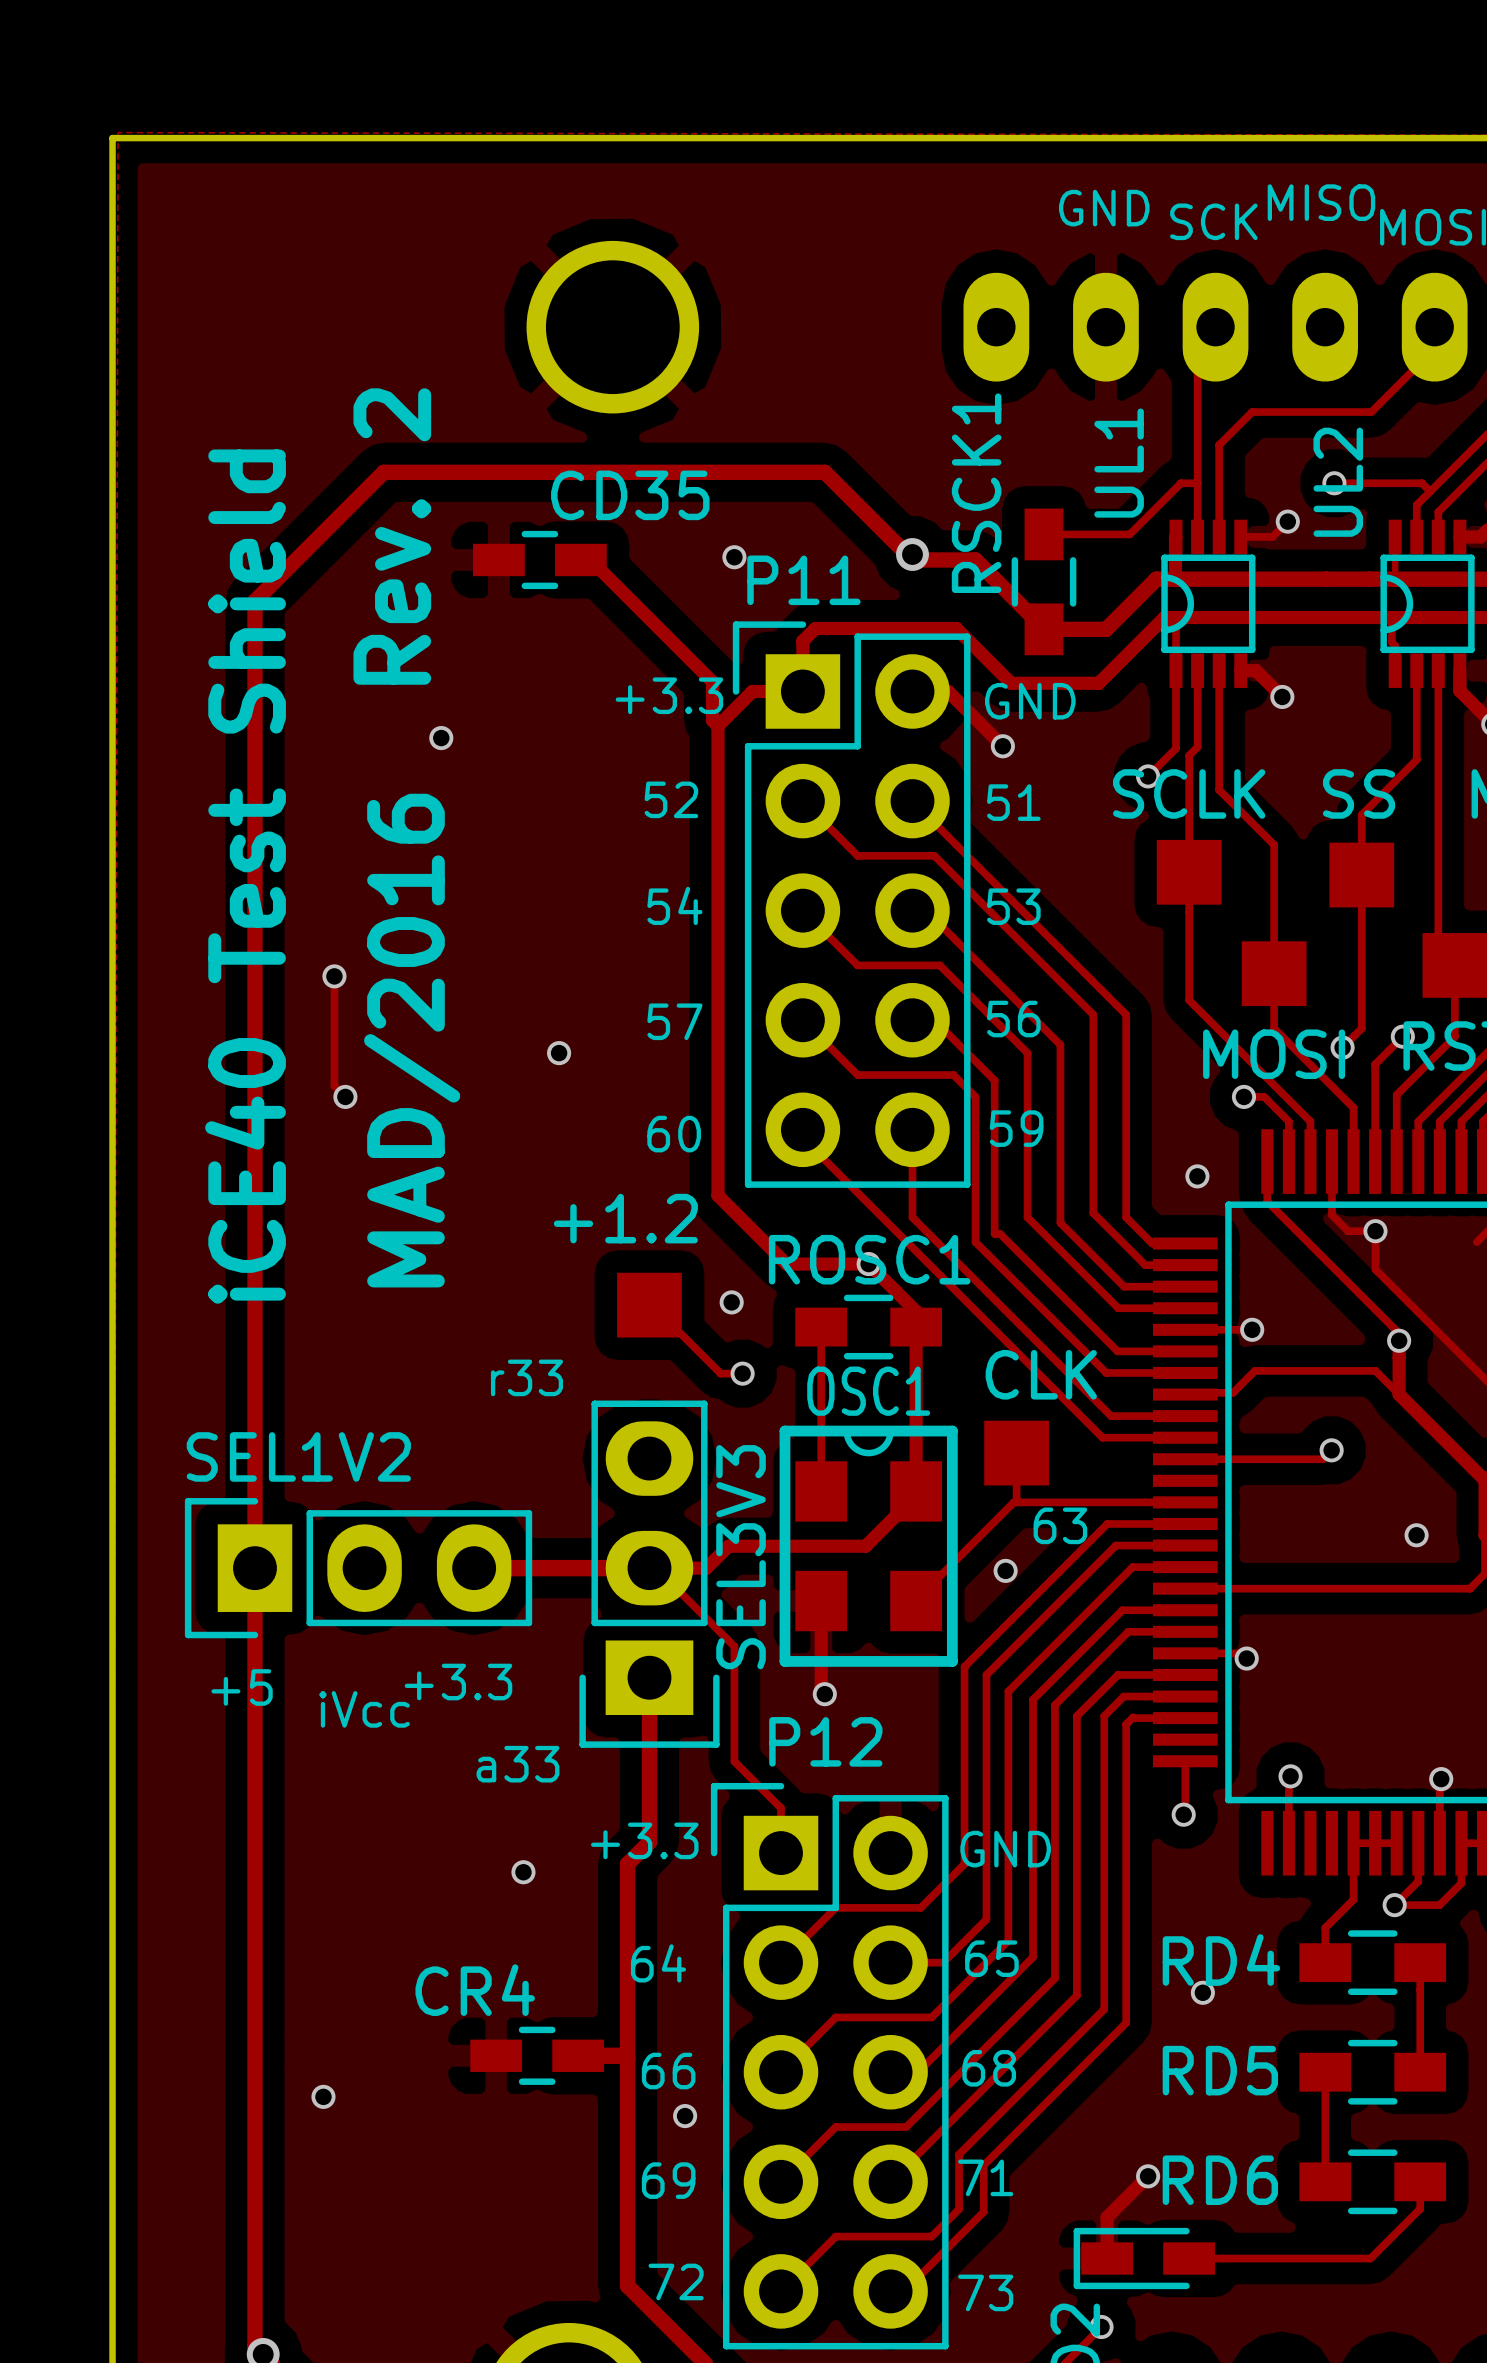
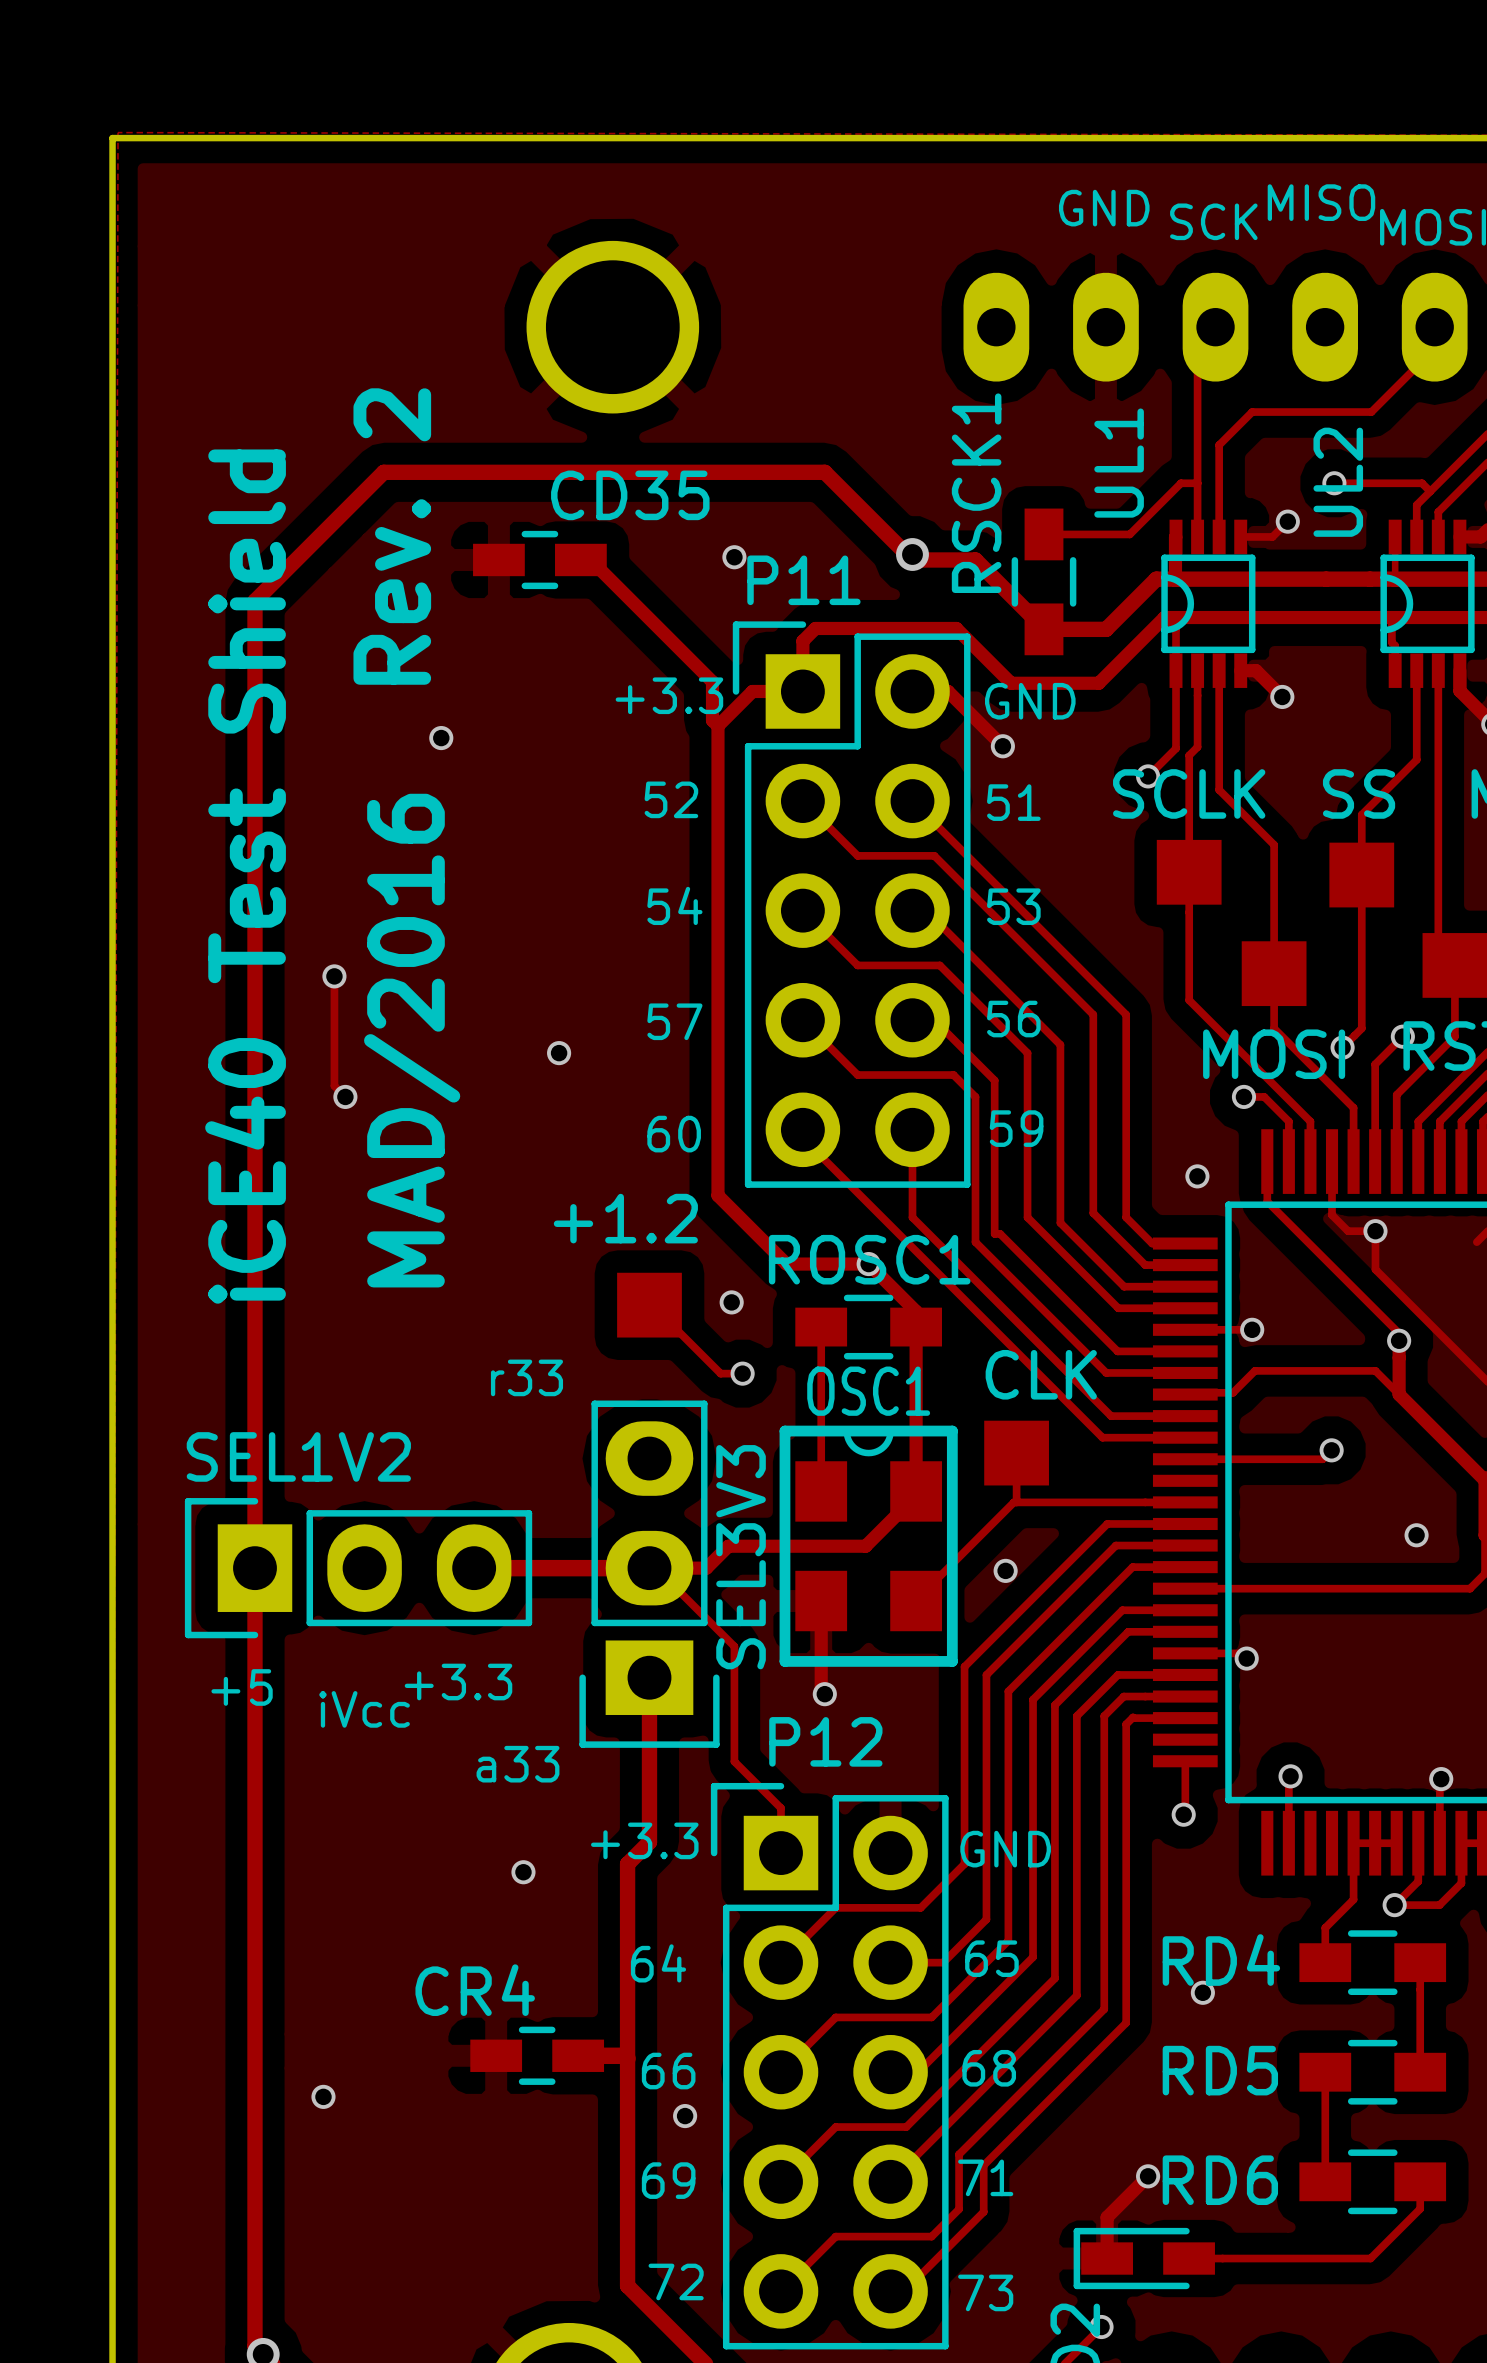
text: 63 (1060, 1525) -> none

